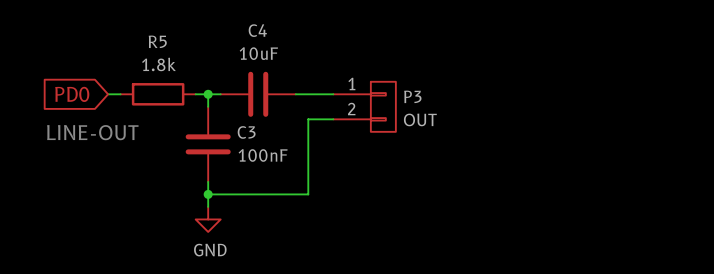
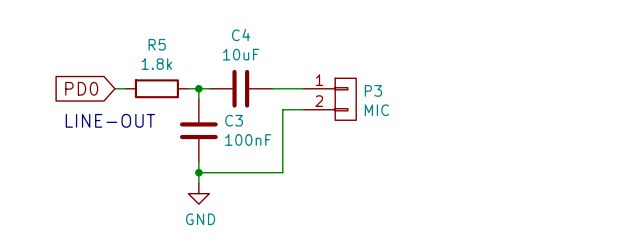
P3 value: OUT (420, 119) -> MIC (376, 110)

